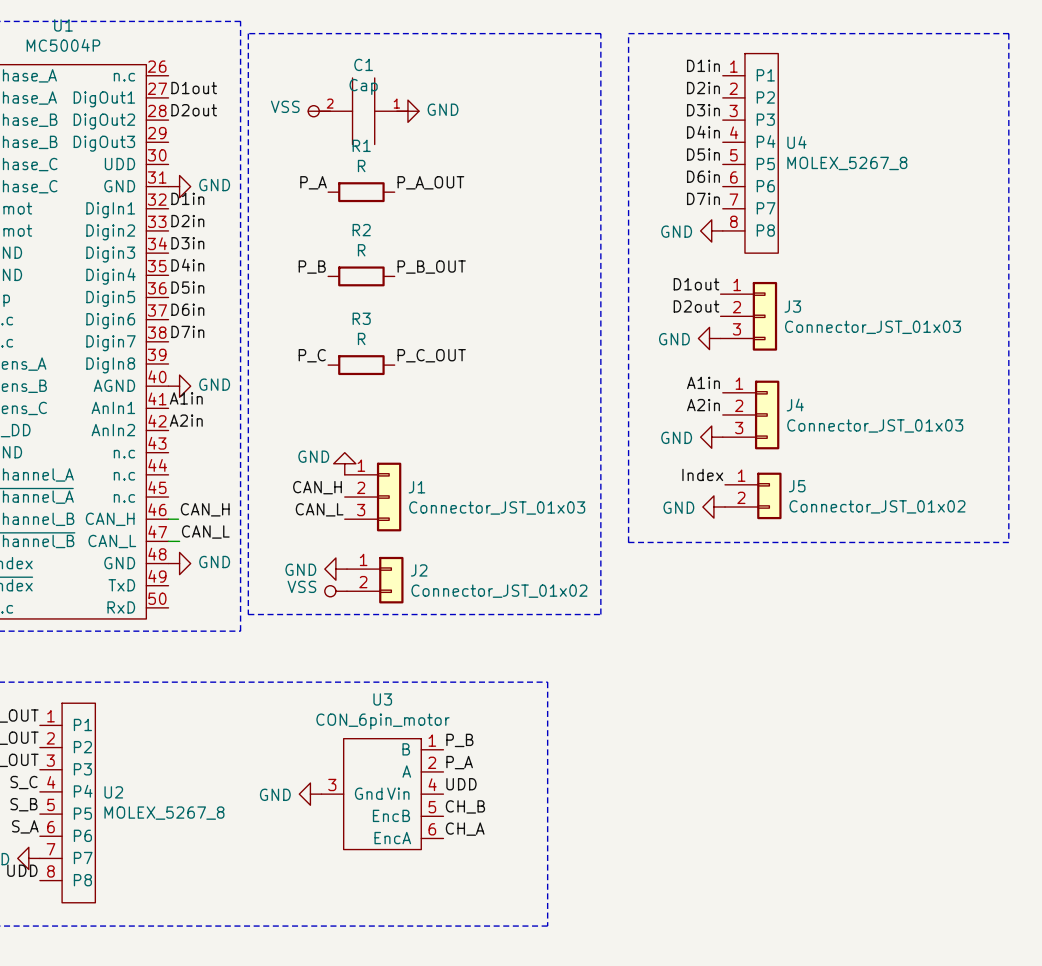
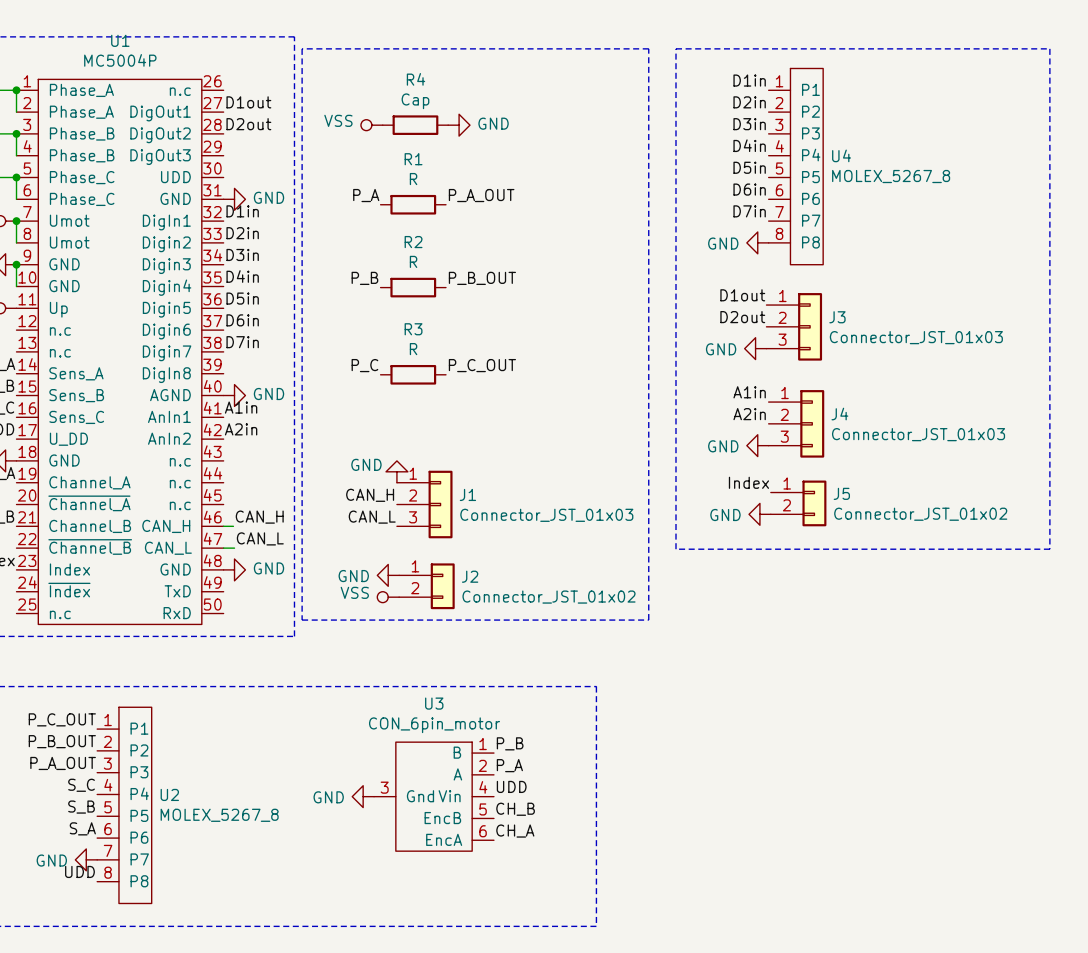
C1: Cap (363, 111) -> none
R4: none -> Cap (415, 125)

